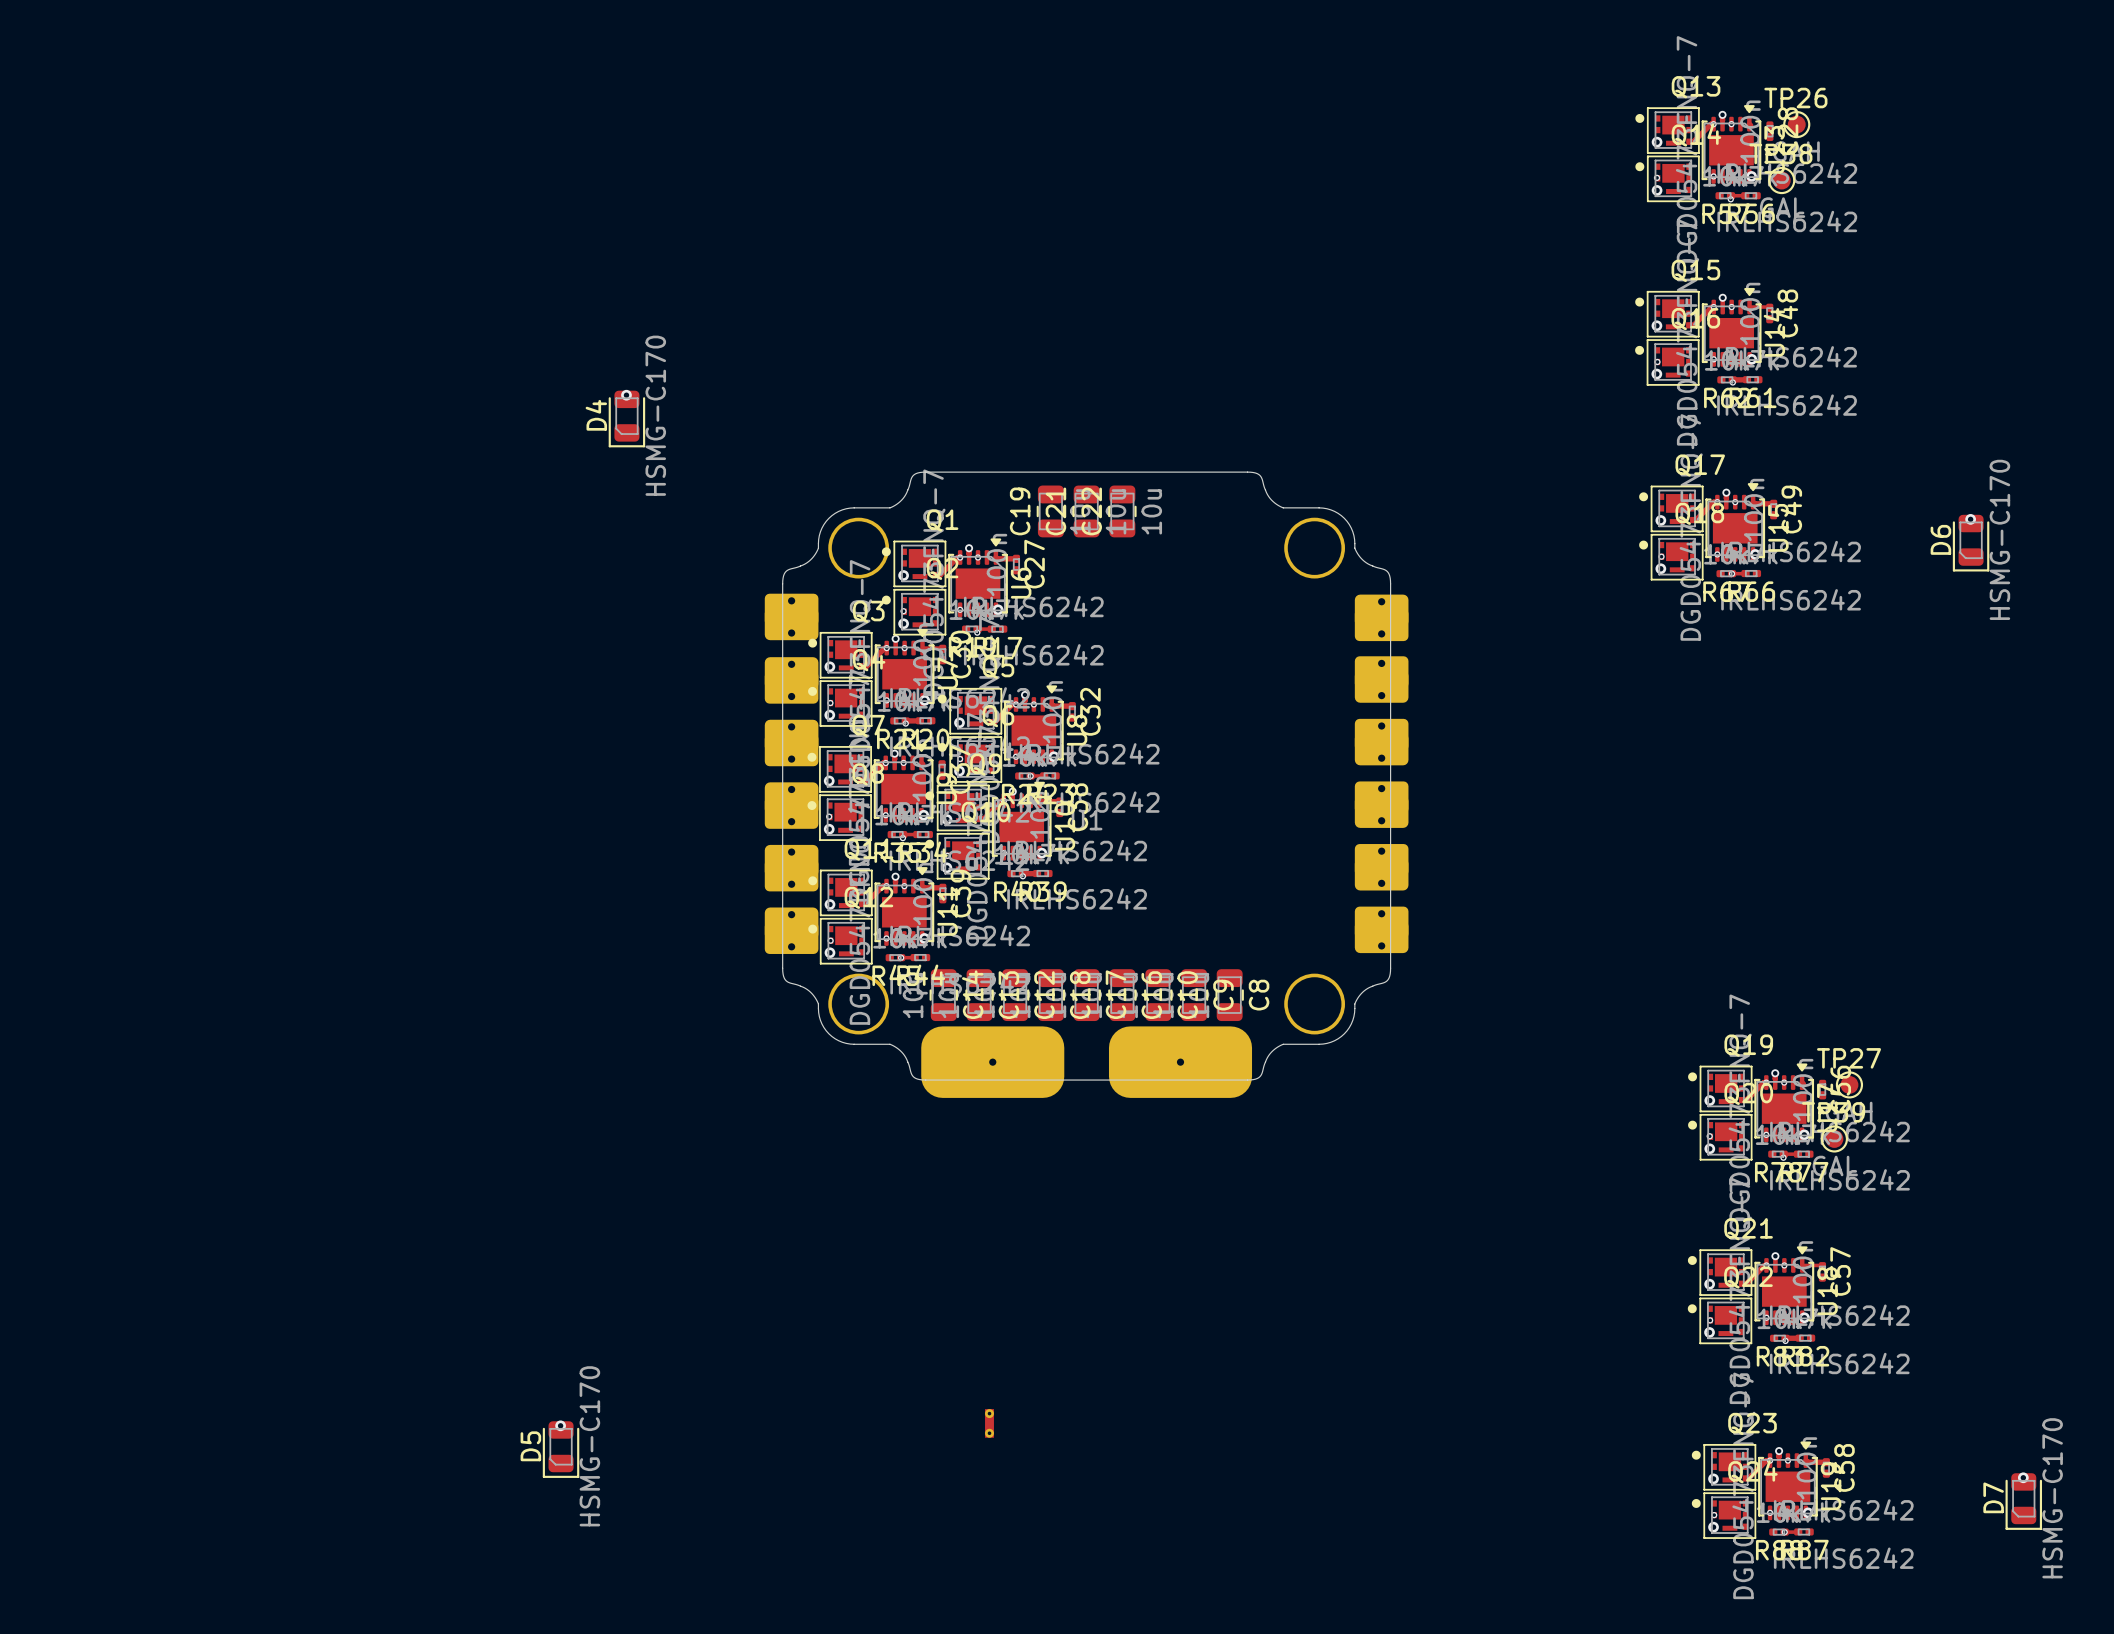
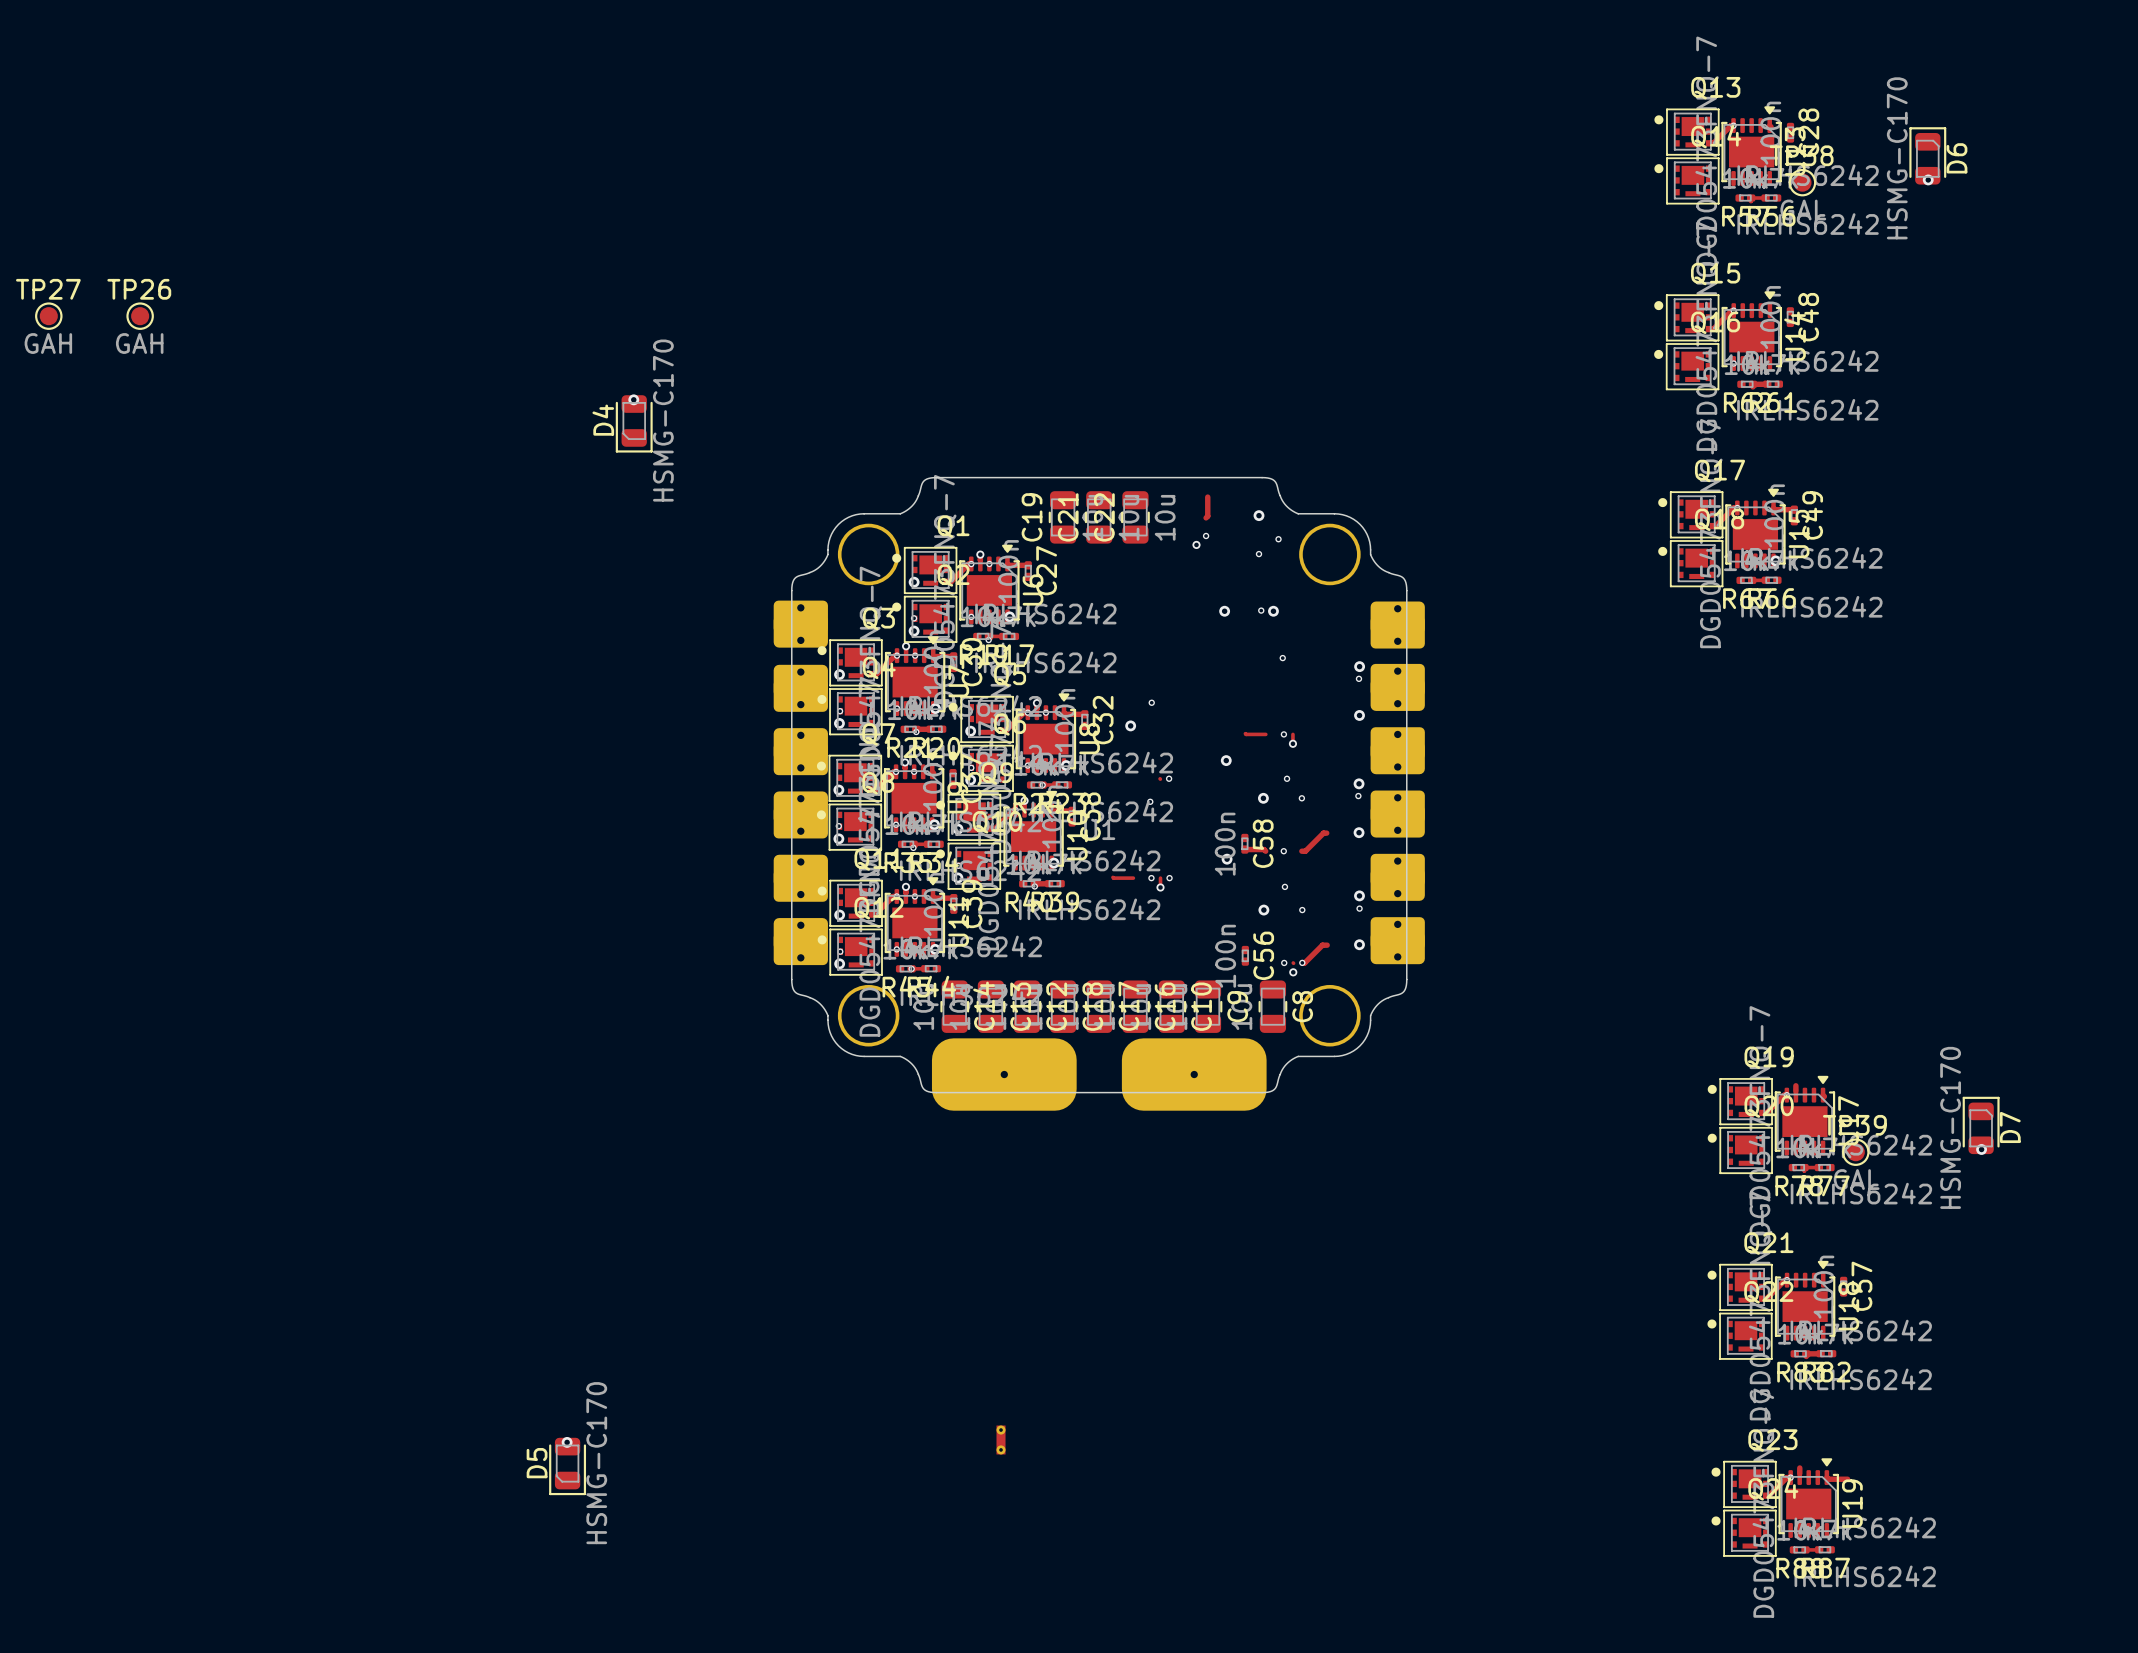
via: (1722, 114) -> none
via: (1731, 124) -> none
TP26 position: (1796, 124) -> (140, 316)
via: (1657, 142) -> none
via: (1713, 176) -> none
via: (1751, 176) -> none
via: (1657, 177) -> none
via: none -> (1928, 179)
via: (1657, 190) -> none
via: (1730, 199) -> none
via: (1722, 297) -> none
via: (1731, 307) -> none
track: (1749, 307) (1769, 307) -> none
via: (1656, 325) -> none
via: (1751, 359) -> none
via: (1657, 361) -> none
via: (1656, 374) -> none
via: (1732, 382) -> none
track: none -> (1207, 497) (1207, 516) (1206, 517)
via: (1726, 492) -> none
via: (1735, 502) -> none
via: none -> (1258, 515)
via: (1970, 519) -> none
via: (1660, 520) -> none
via: none -> (1206, 535)
via: none -> (1278, 539)
via: none -> (1196, 544)
D6 rotation: 0° (1971, 543) -> 180° (1927, 155)
D6 position: (1971, 543) -> (1927, 155)
via: none -> (1258, 554)
via: (1717, 554) -> none
via: (1661, 556) -> none
via: (1660, 568) -> none
via: (1732, 573) -> none
via: none -> (1261, 610)
via: none -> (1224, 611)
via: none -> (1273, 611)
via: none -> (1282, 658)
via: none -> (1359, 666)
via: none -> (1358, 678)
via: none -> (1151, 702)
via: none -> (1359, 715)
via: none -> (1130, 725)
track: none -> (1245, 733) (1265, 734)
via: none -> (1283, 734)
track: none -> (1292, 734) (1292, 743)
via: none -> (1292, 743)
via: none -> (1226, 760)
track: none -> (1160, 778) (1160, 779)
via: none -> (1169, 778)
via: none -> (1287, 778)
via: none -> (1359, 783)
via: none -> (1358, 796)
via: none -> (1263, 798)
via: none -> (1301, 798)
via: none -> (1150, 801)
track: none -> (1326, 833) (1323, 833) (1305, 851) (1301, 851)
via: none -> (1359, 832)
track: none -> (1244, 849) (1264, 849) (1265, 851)
via: none -> (1283, 851)
via: none -> (1227, 859)
track: none -> (1112, 877) (1133, 878)
via: none -> (1151, 878)
track: none -> (1160, 878) (1160, 887)
via: none -> (1169, 878)
via: none -> (1284, 886)
via: none -> (1160, 887)
via: none -> (1359, 895)
via: none -> (1359, 908)
via: none -> (1263, 910)
via: none -> (1302, 910)
via: none -> (1359, 944)
track: none -> (1327, 945) (1322, 945) (1304, 962) (1302, 962)
via: none -> (1284, 962)
track: none -> (1293, 962) (1293, 963)
via: none -> (1302, 962)
via: none -> (1293, 972)
C8 position: (1229, 995) -> (1272, 1006)
via: (1775, 1073) -> none
via: (1784, 1082) -> none
TP27 position: (1849, 1084) -> (48, 316)
C56 position: (1822, 1089) -> (1245, 955)
via: (1709, 1100) -> none
via: (1766, 1134) -> none
via: (1804, 1134) -> none
via: (1709, 1136) -> none
via: none -> (1981, 1149)
via: (1709, 1148) -> none
via: (1783, 1157) -> none
via: (1775, 1256) -> none
via: (1784, 1265) -> none
track: (1802, 1265) (1822, 1266) -> none
via: (1709, 1284) -> none
via: (1766, 1317) -> none
via: (1804, 1317) -> none
via: (1710, 1320) -> none
via: (1709, 1332) -> none
via: (1785, 1340) -> none
via: (1779, 1451) -> none
via: (1787, 1460) -> none
C58 position: (1826, 1467) -> (1244, 843)
via: (2023, 1477) -> none
via: (1713, 1478) -> none
D7 rotation: 0° (2023, 1501) -> 180° (1981, 1125)
D7 position: (2023, 1501) -> (1981, 1125)
via: (1770, 1512) -> none
via: (1808, 1512) -> none
via: (1714, 1515) -> none
via: (1713, 1527) -> none
via: (1784, 1532) -> none

